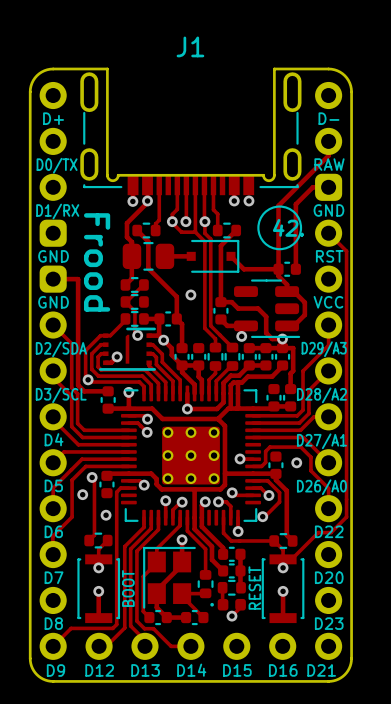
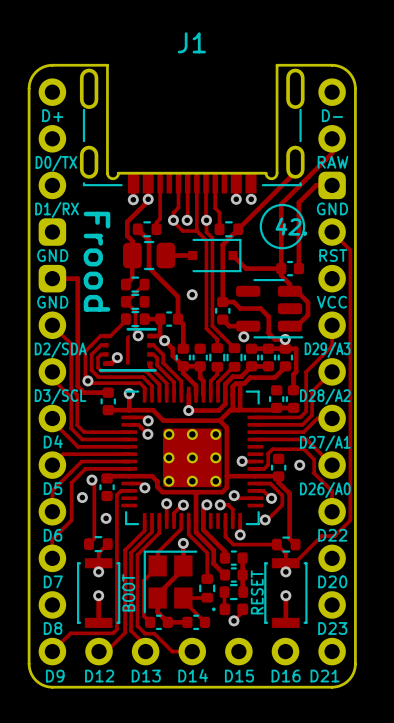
track: none -> (295, 162) (295, 172) (238, 229)

